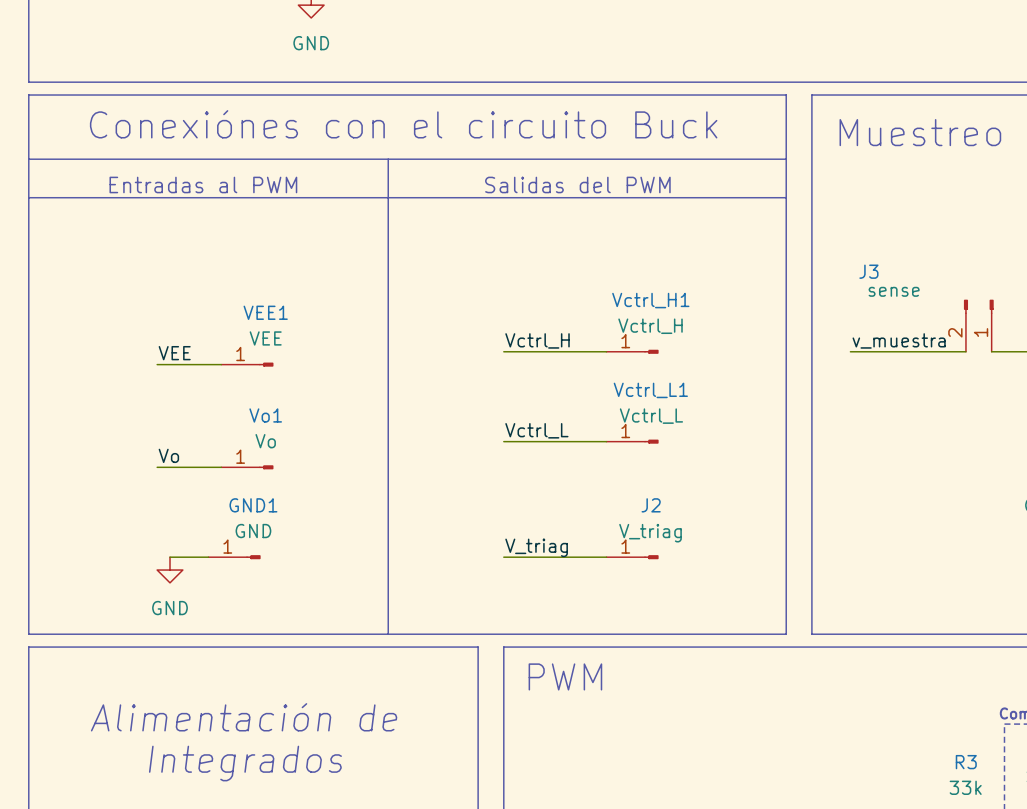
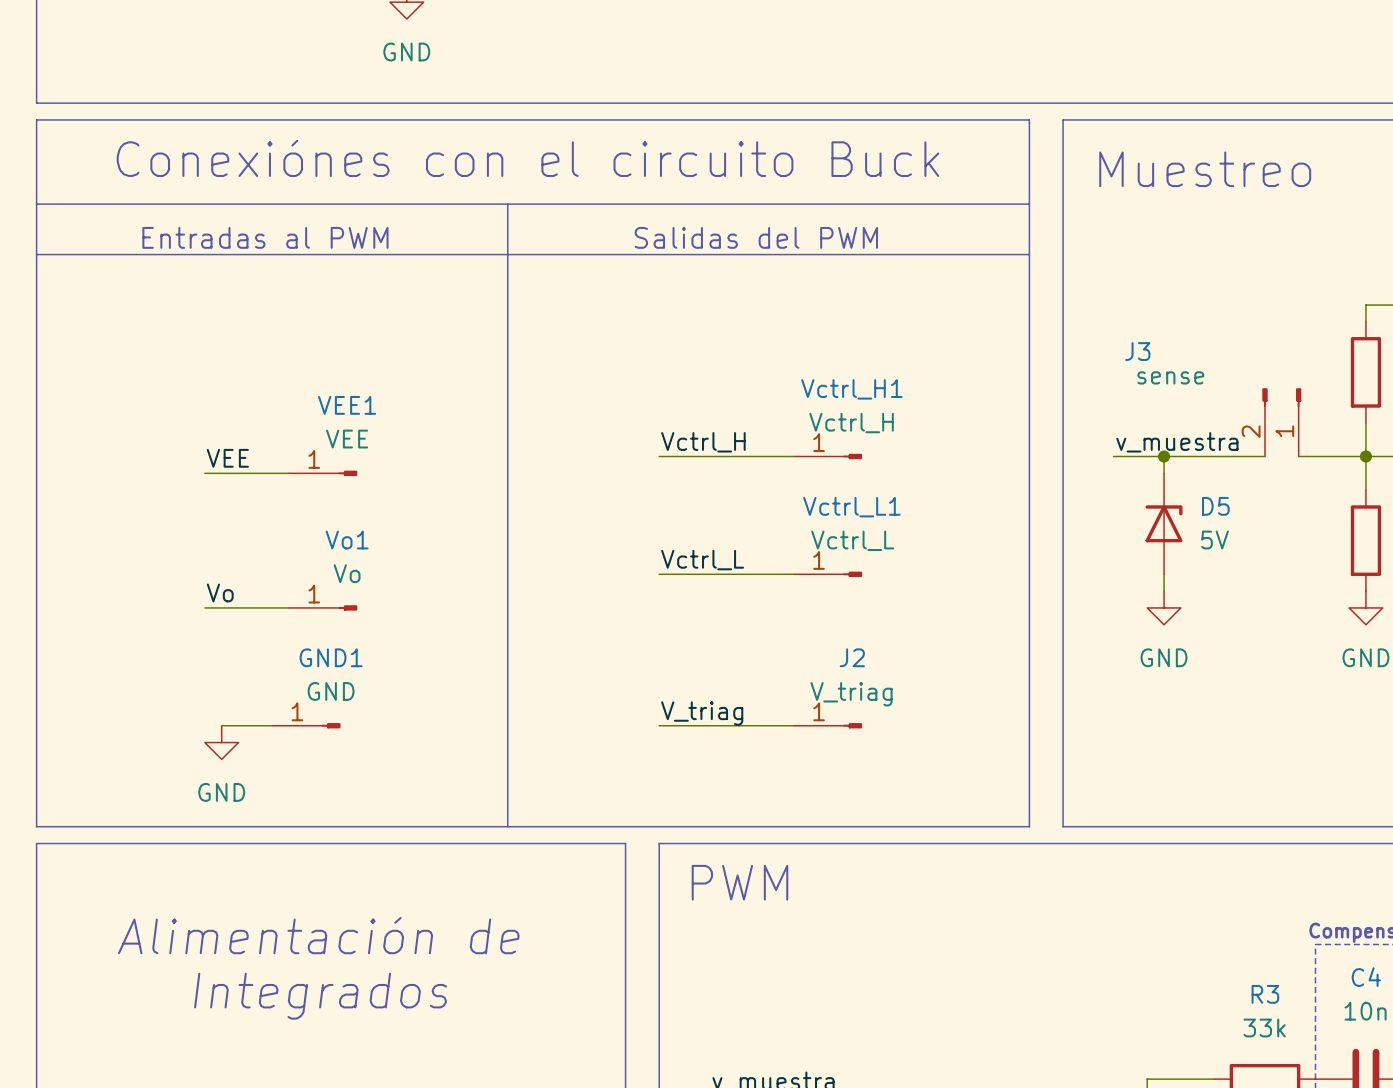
wire: none -> (1164, 456) (1164, 473)
junction: none -> (1164, 456)
D5: none -> 5V (1164, 523)
wire: none -> (1164, 574) (1164, 591)
power symbol: none -> GND (1164, 607)

